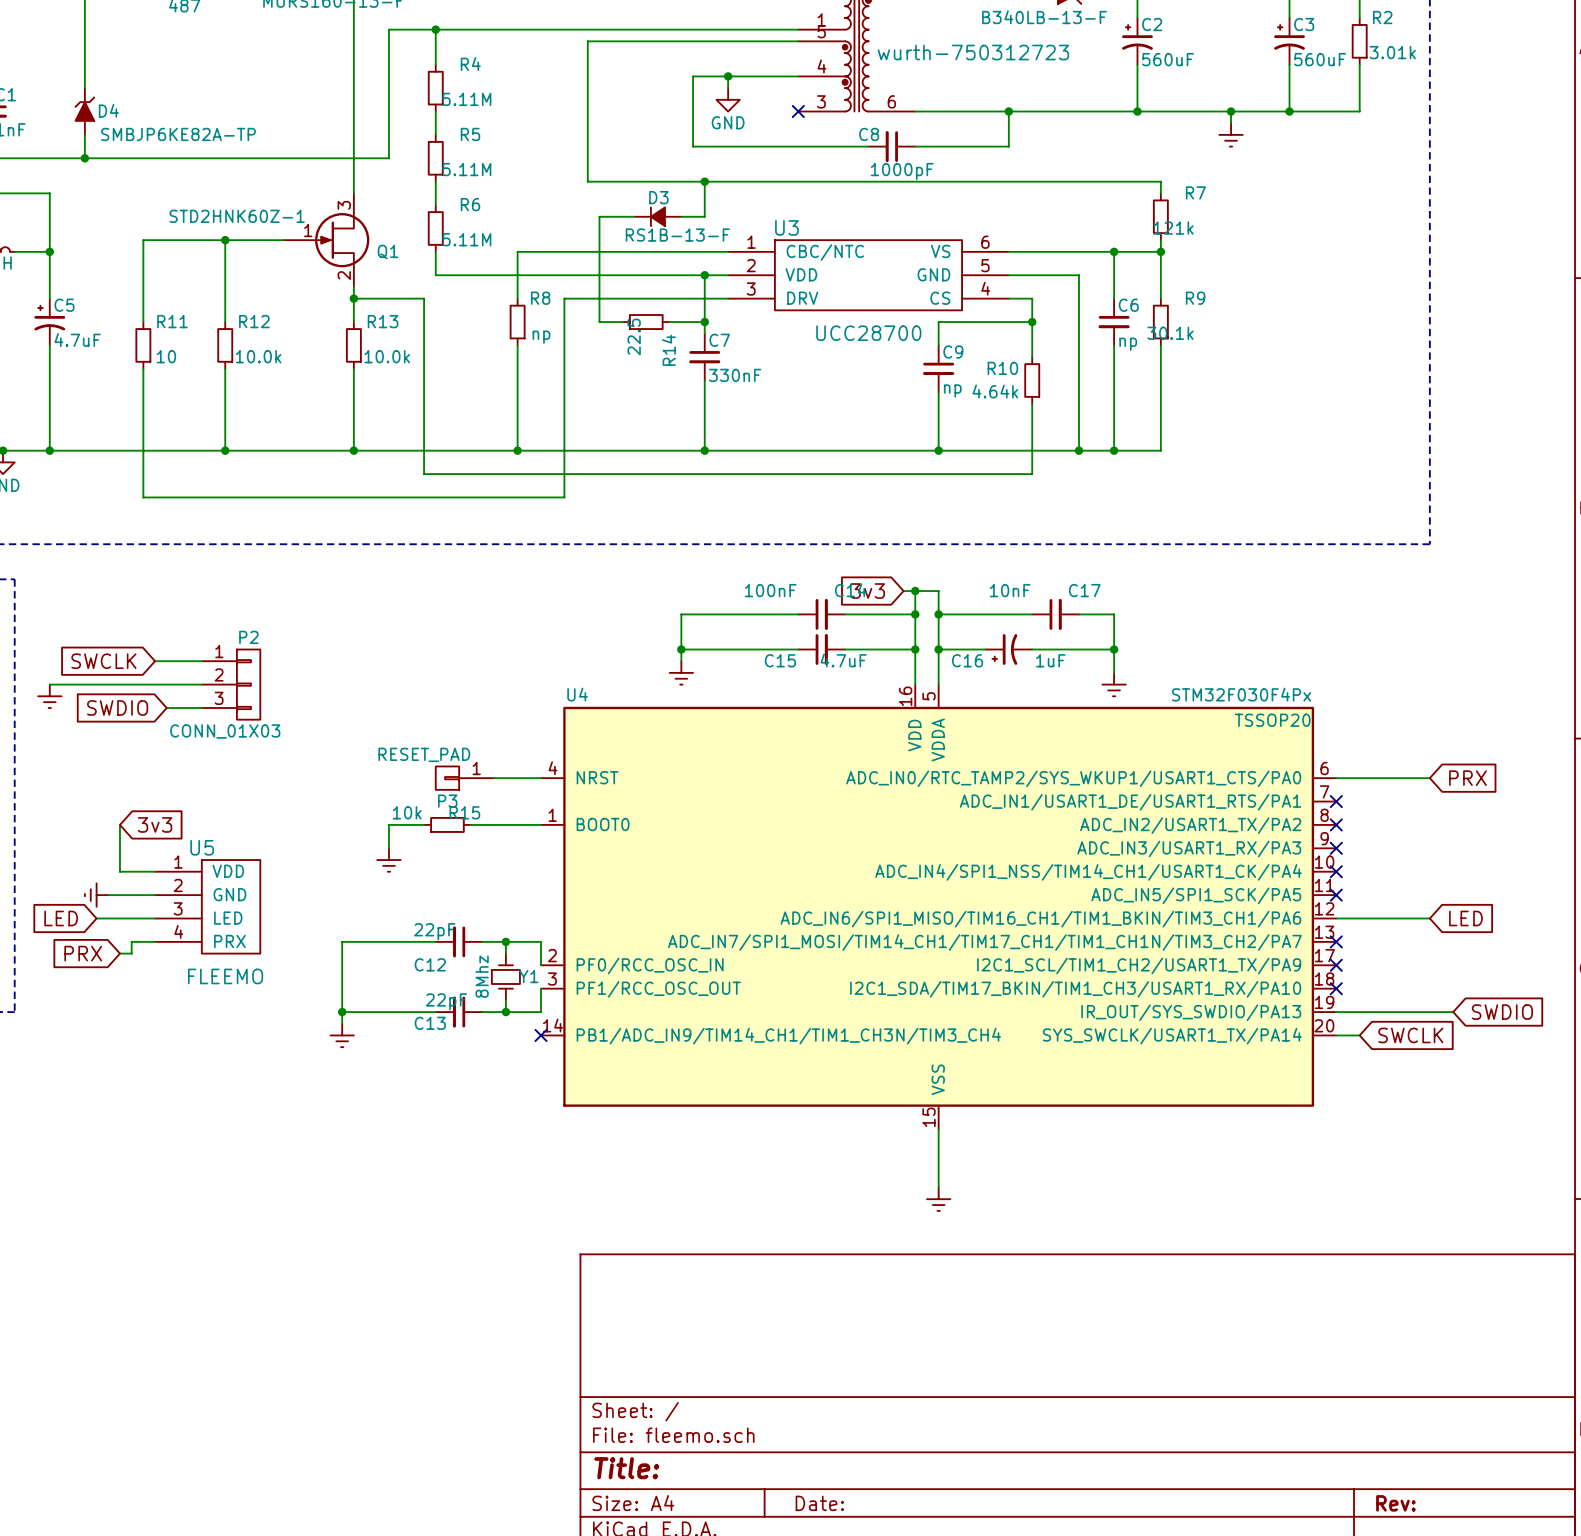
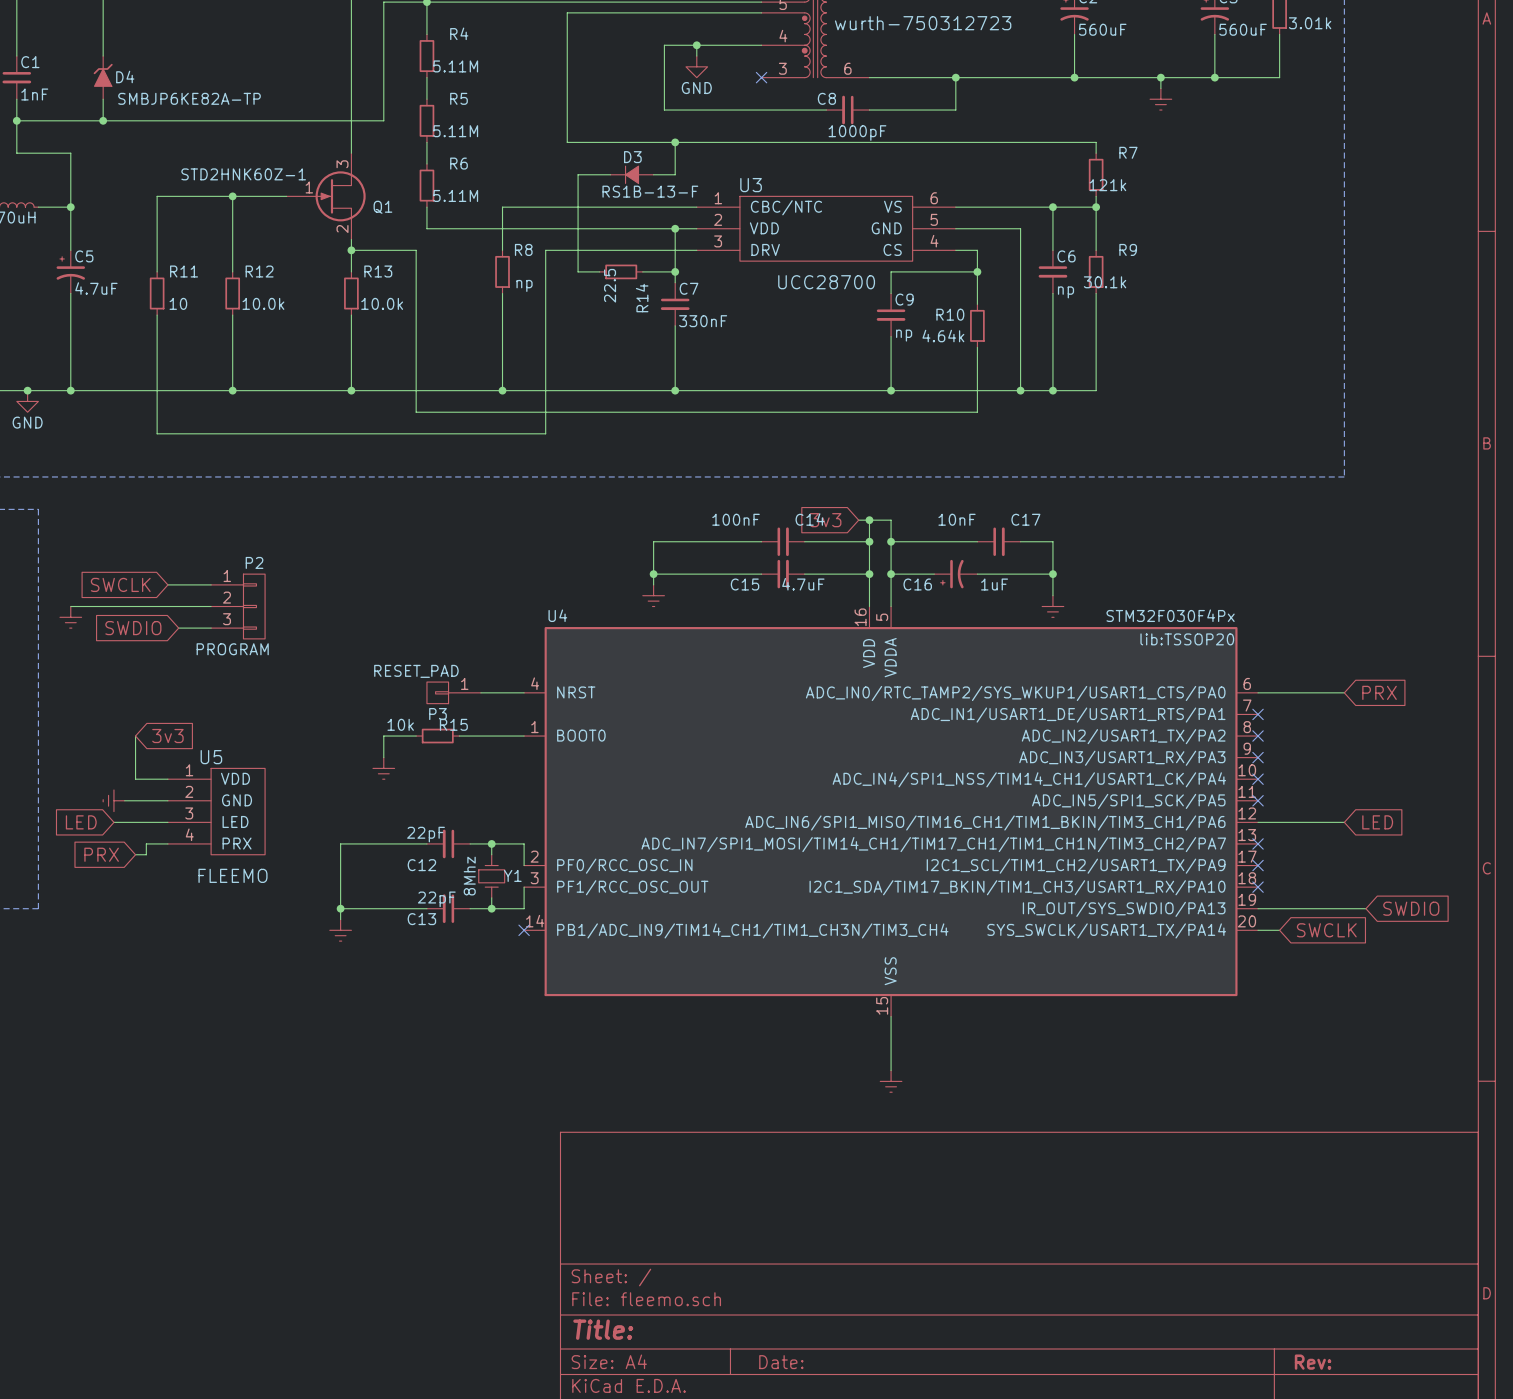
U4 text: TSSOP20 (1272, 720) -> lib:TSSOP20 (1187, 639)
P2 value: CONN_01X03 (225, 731) -> PROGRAM (232, 649)

